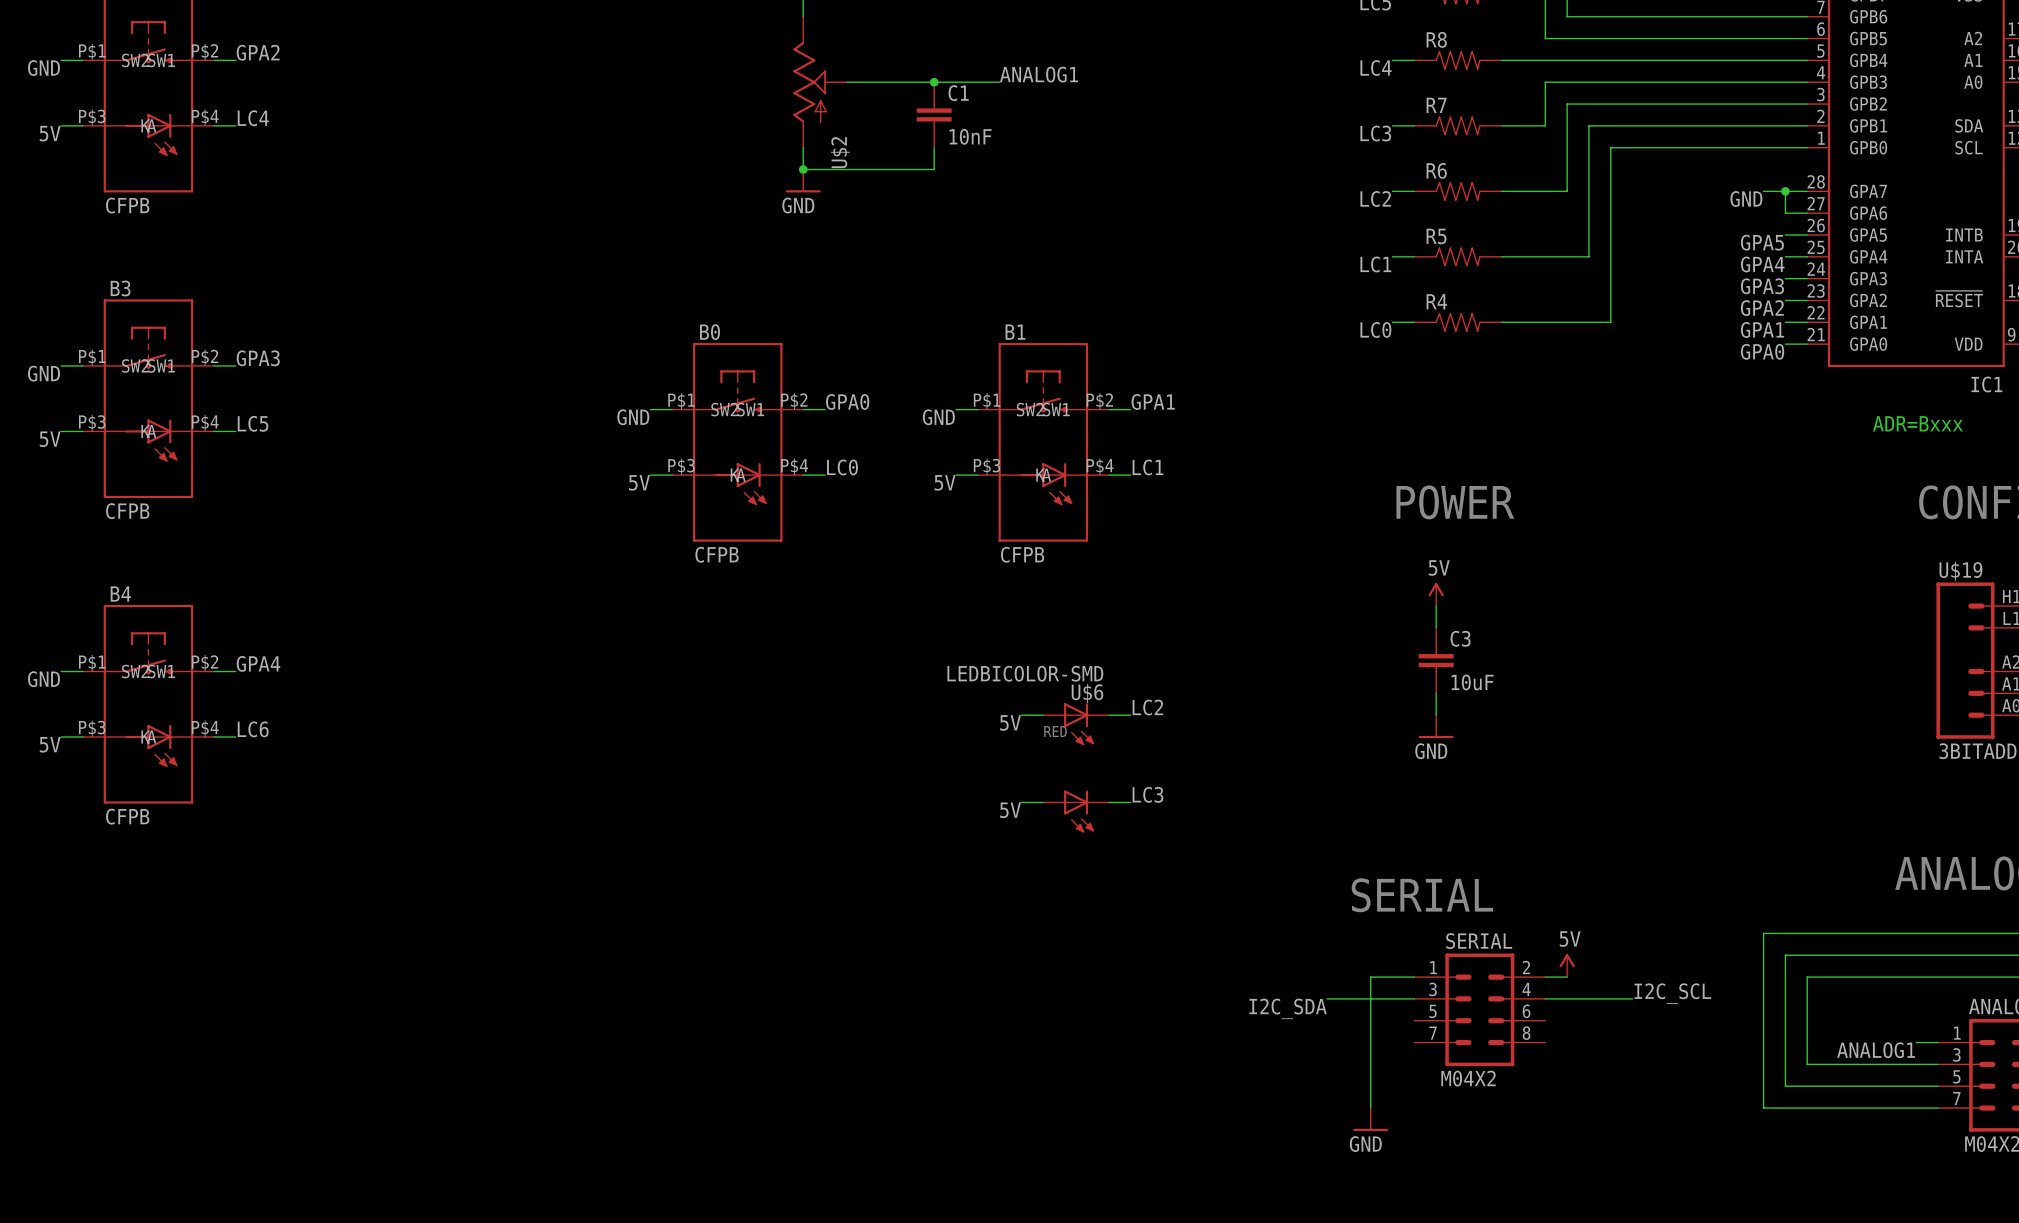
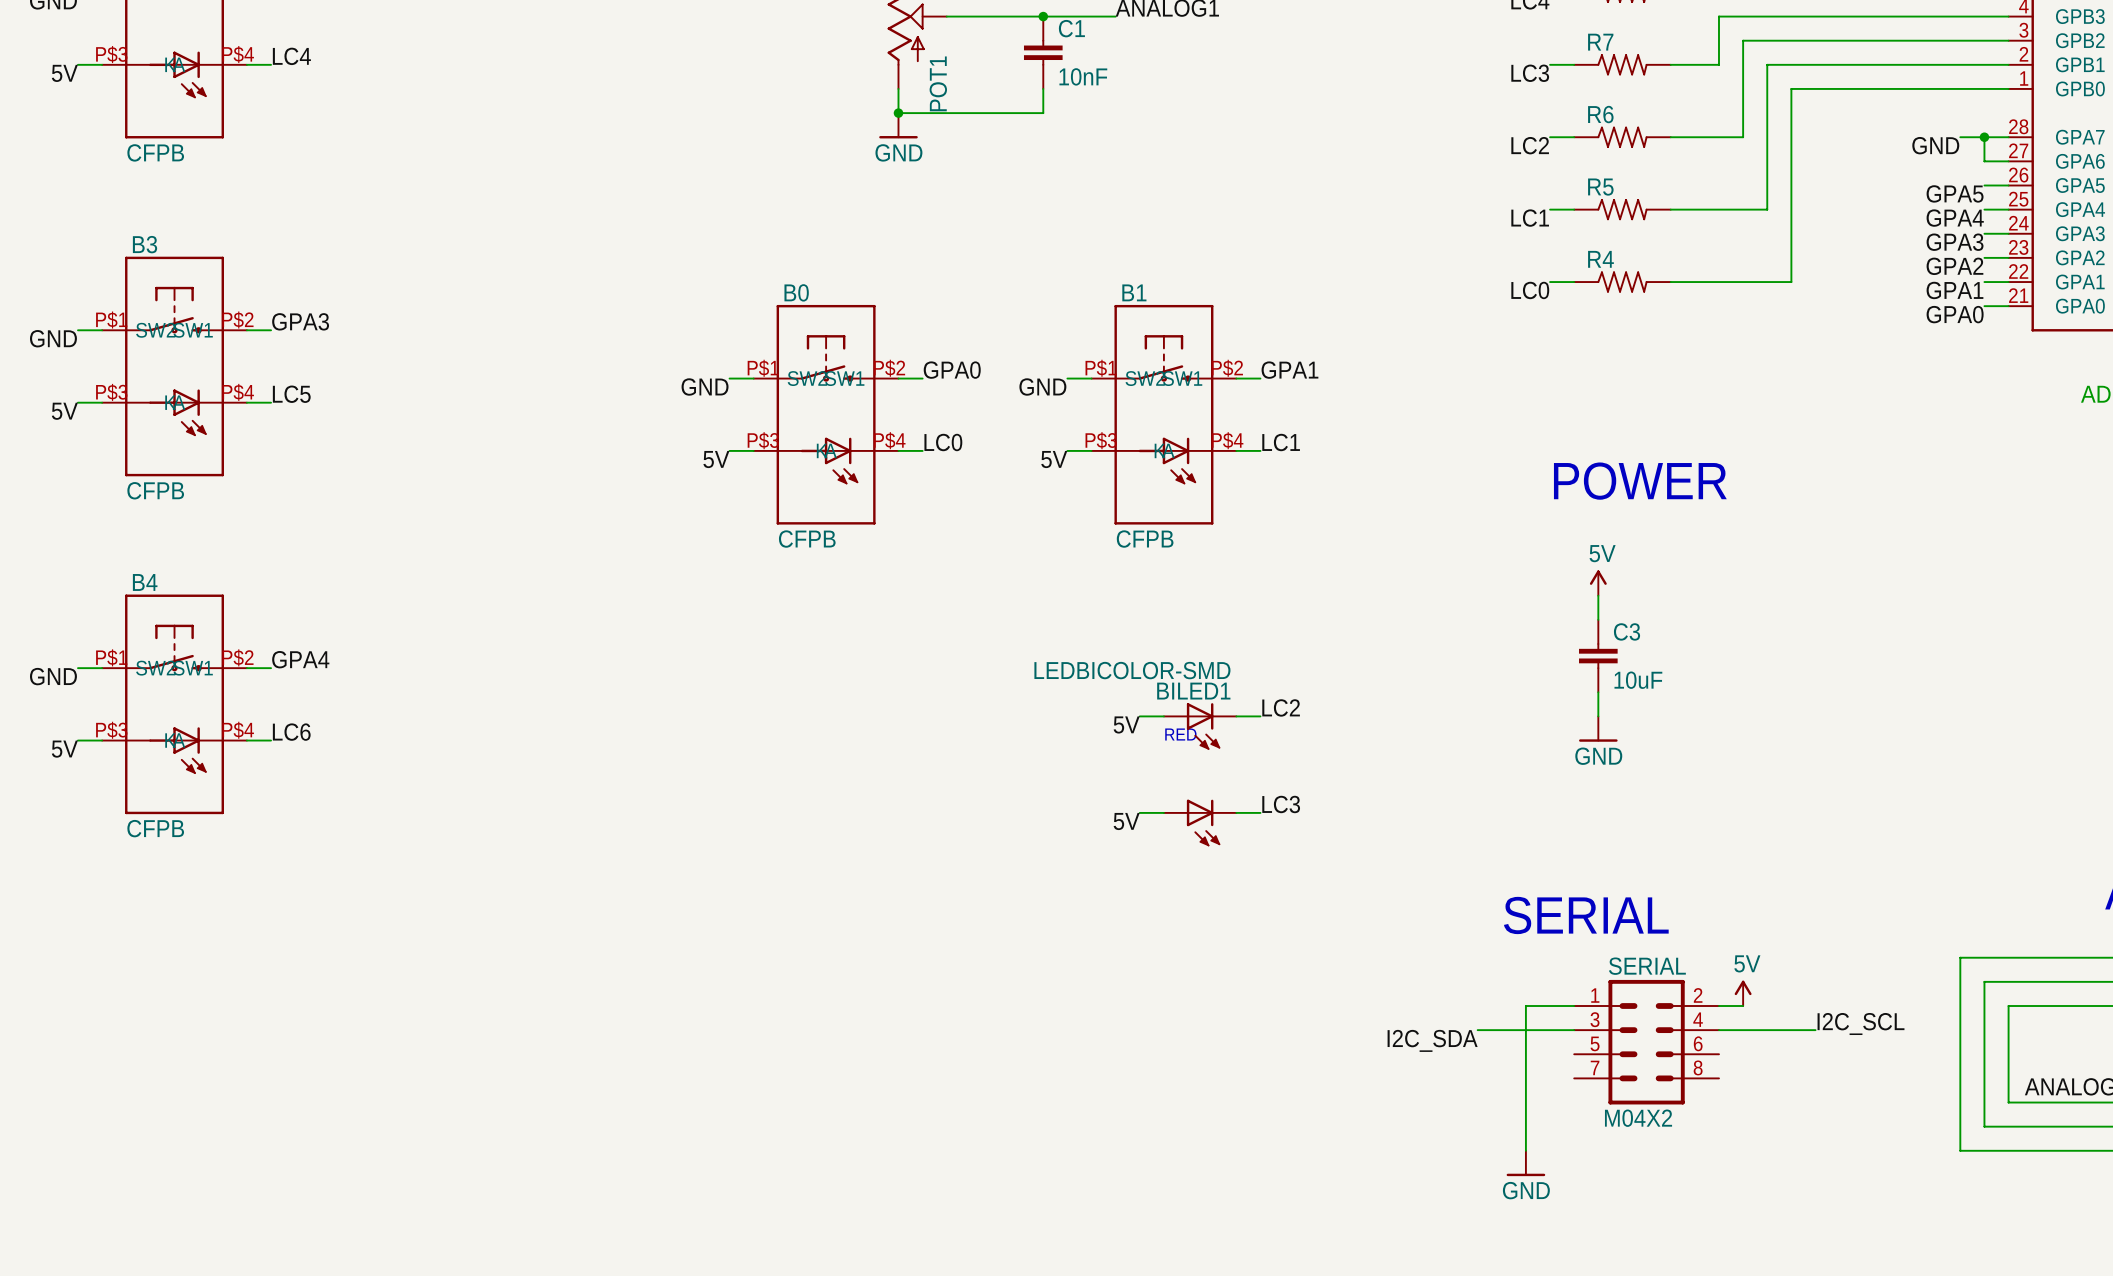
U$2 name: U$2 (840, 152) -> POT1 (938, 83)
U$6 name: U$6 (1087, 693) -> BILED1 (1193, 691)

